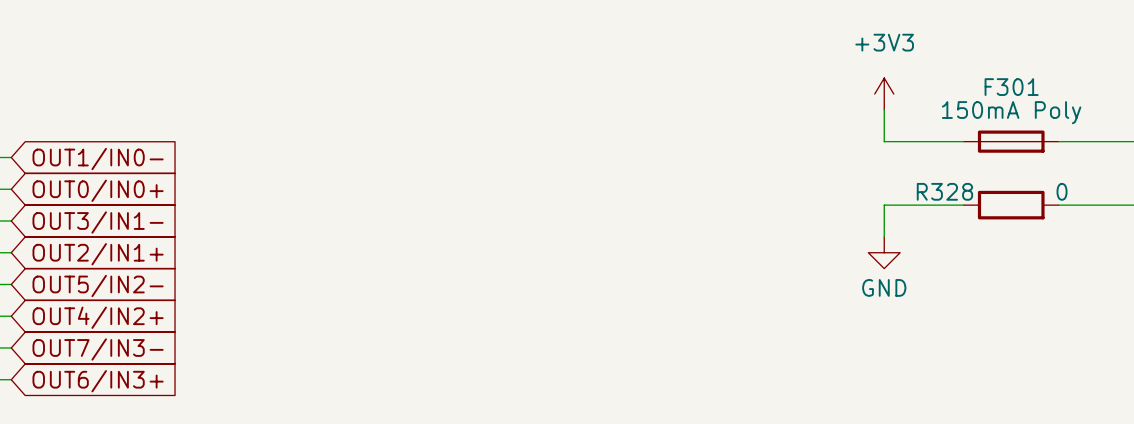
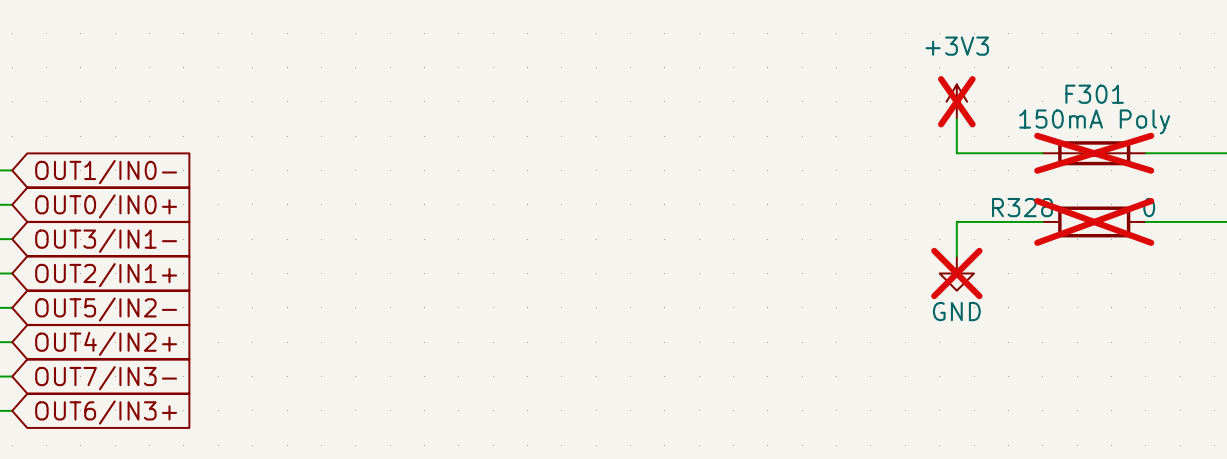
power symbol do-not-place cross: none -> (956, 101)
F301 do-not-place cross: none -> (1094, 153)
R328 do-not-place cross: none -> (1094, 221)
power symbol do-not-place cross: none -> (956, 273)

